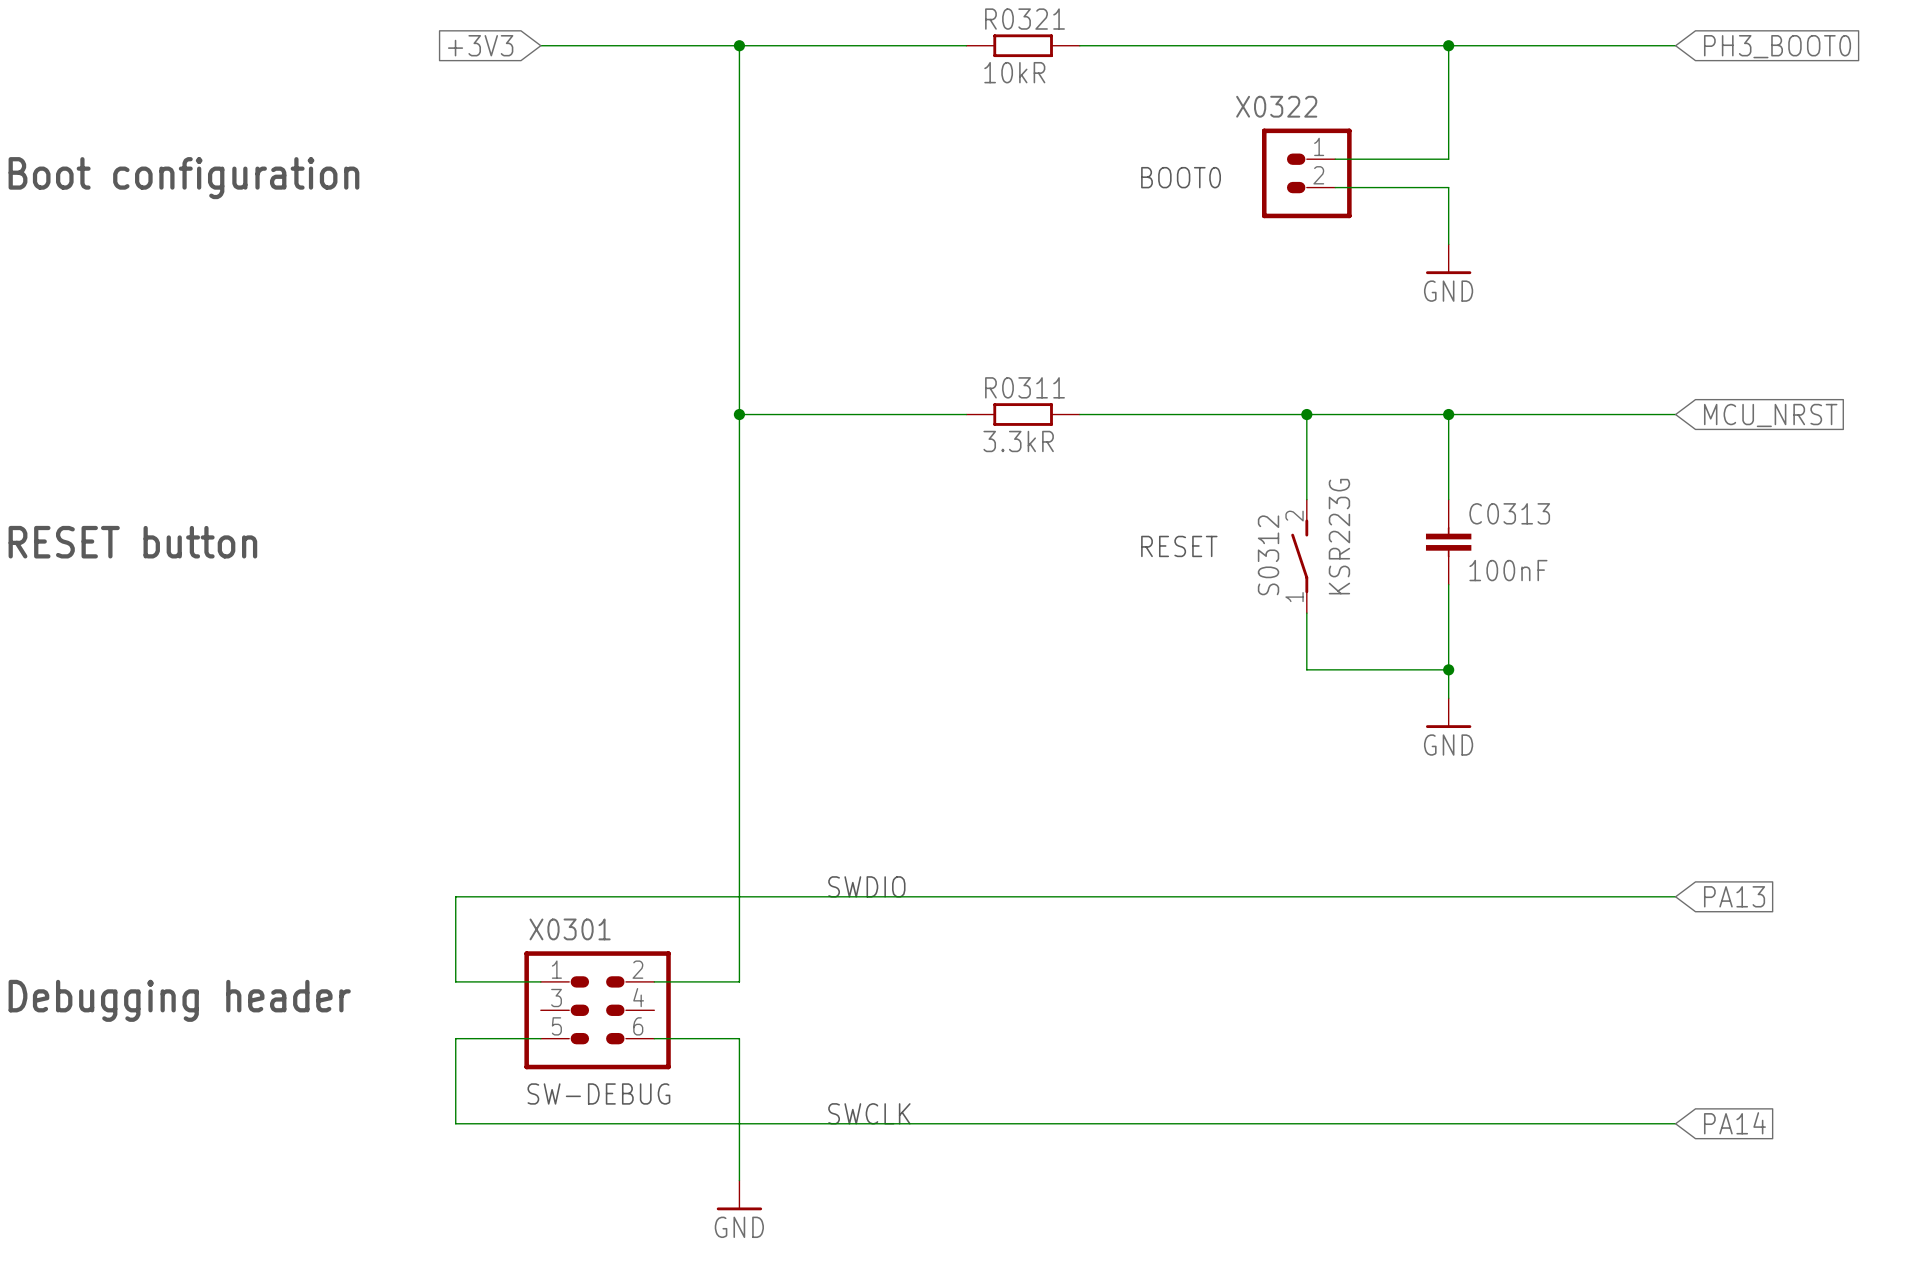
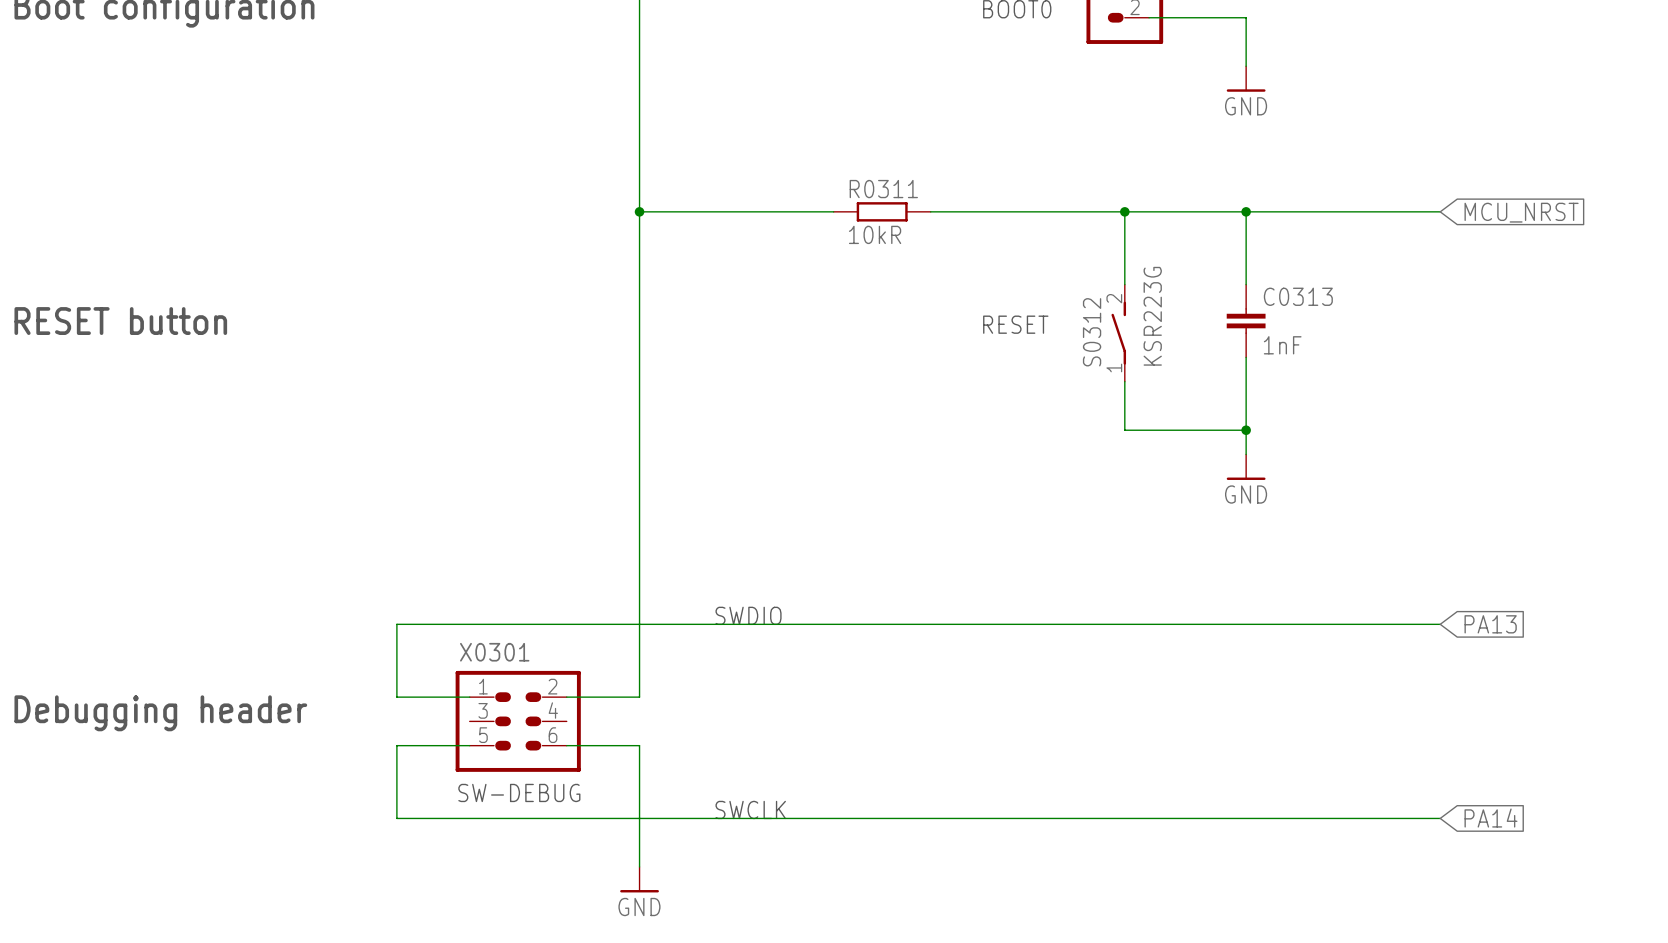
R0311 value: 3.3kR (1018, 441) -> 10kR (875, 234)
C0313 value: 100nF (1508, 570) -> 1nF (1282, 345)

